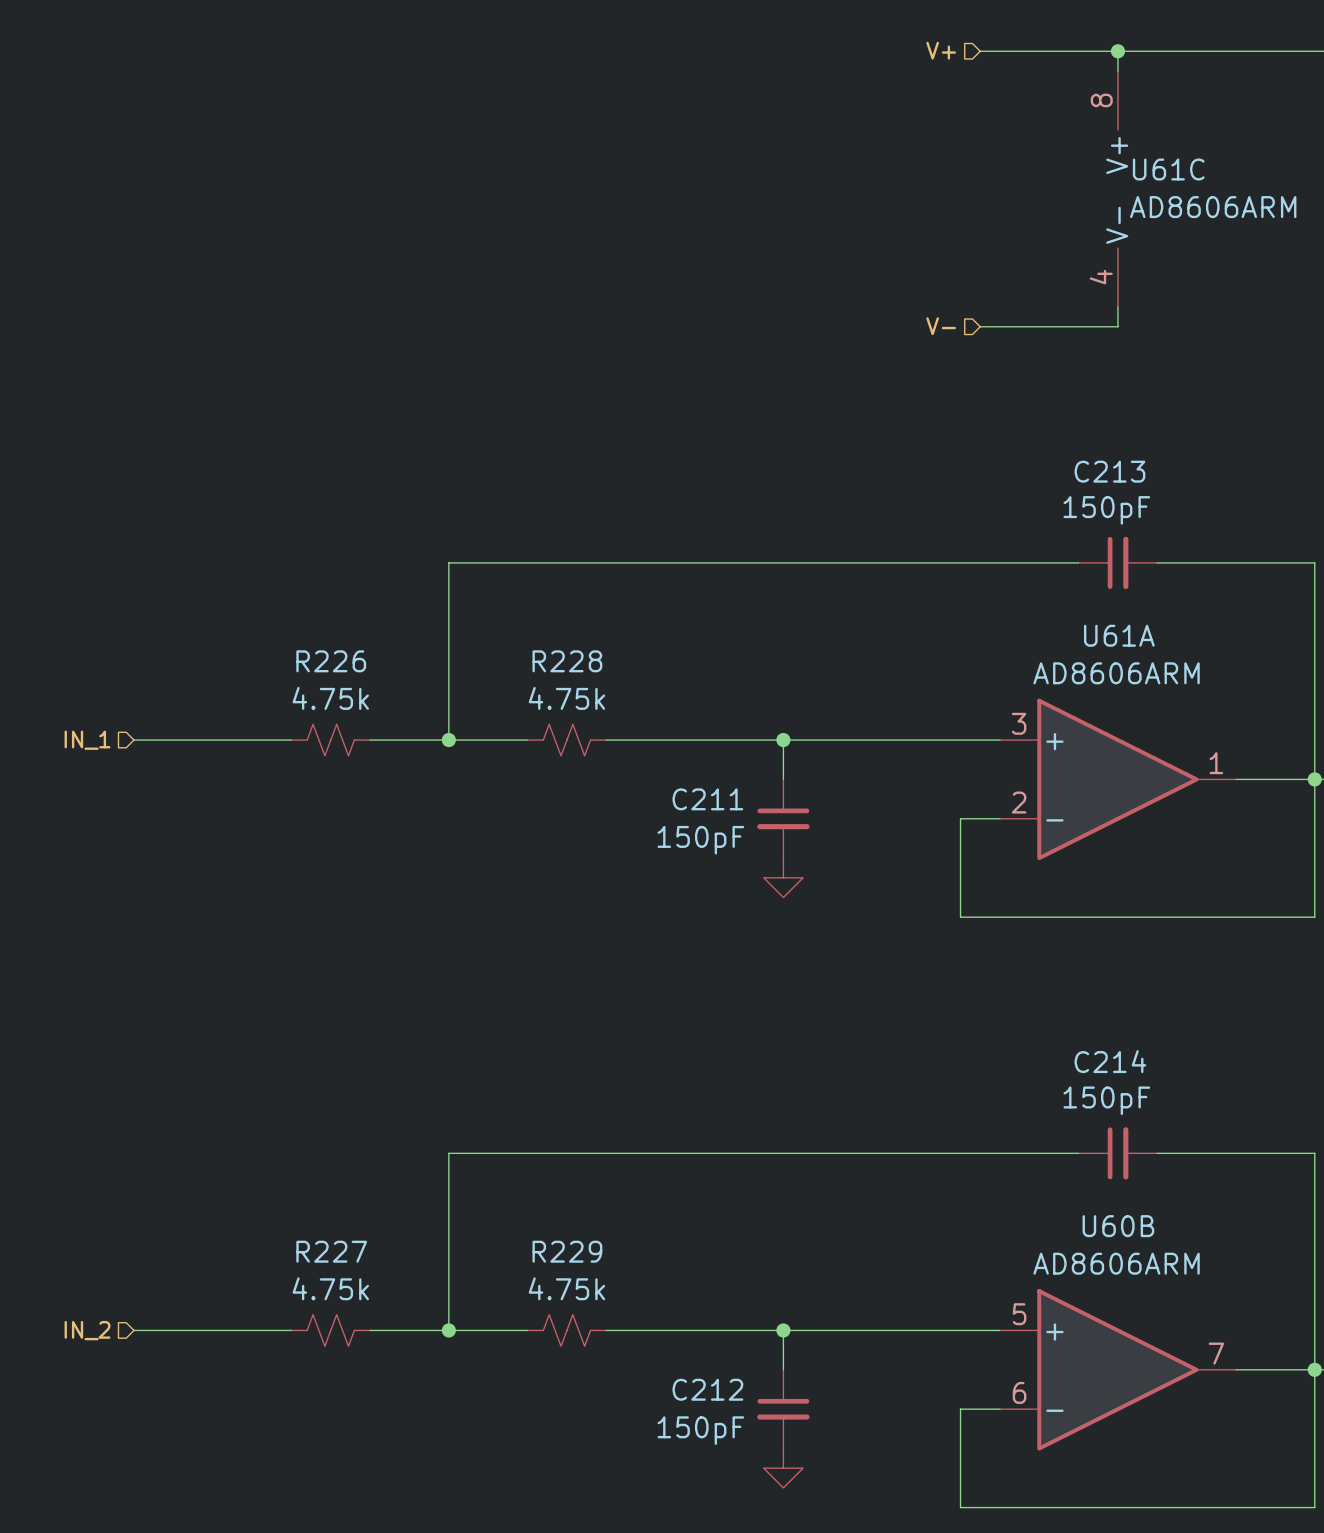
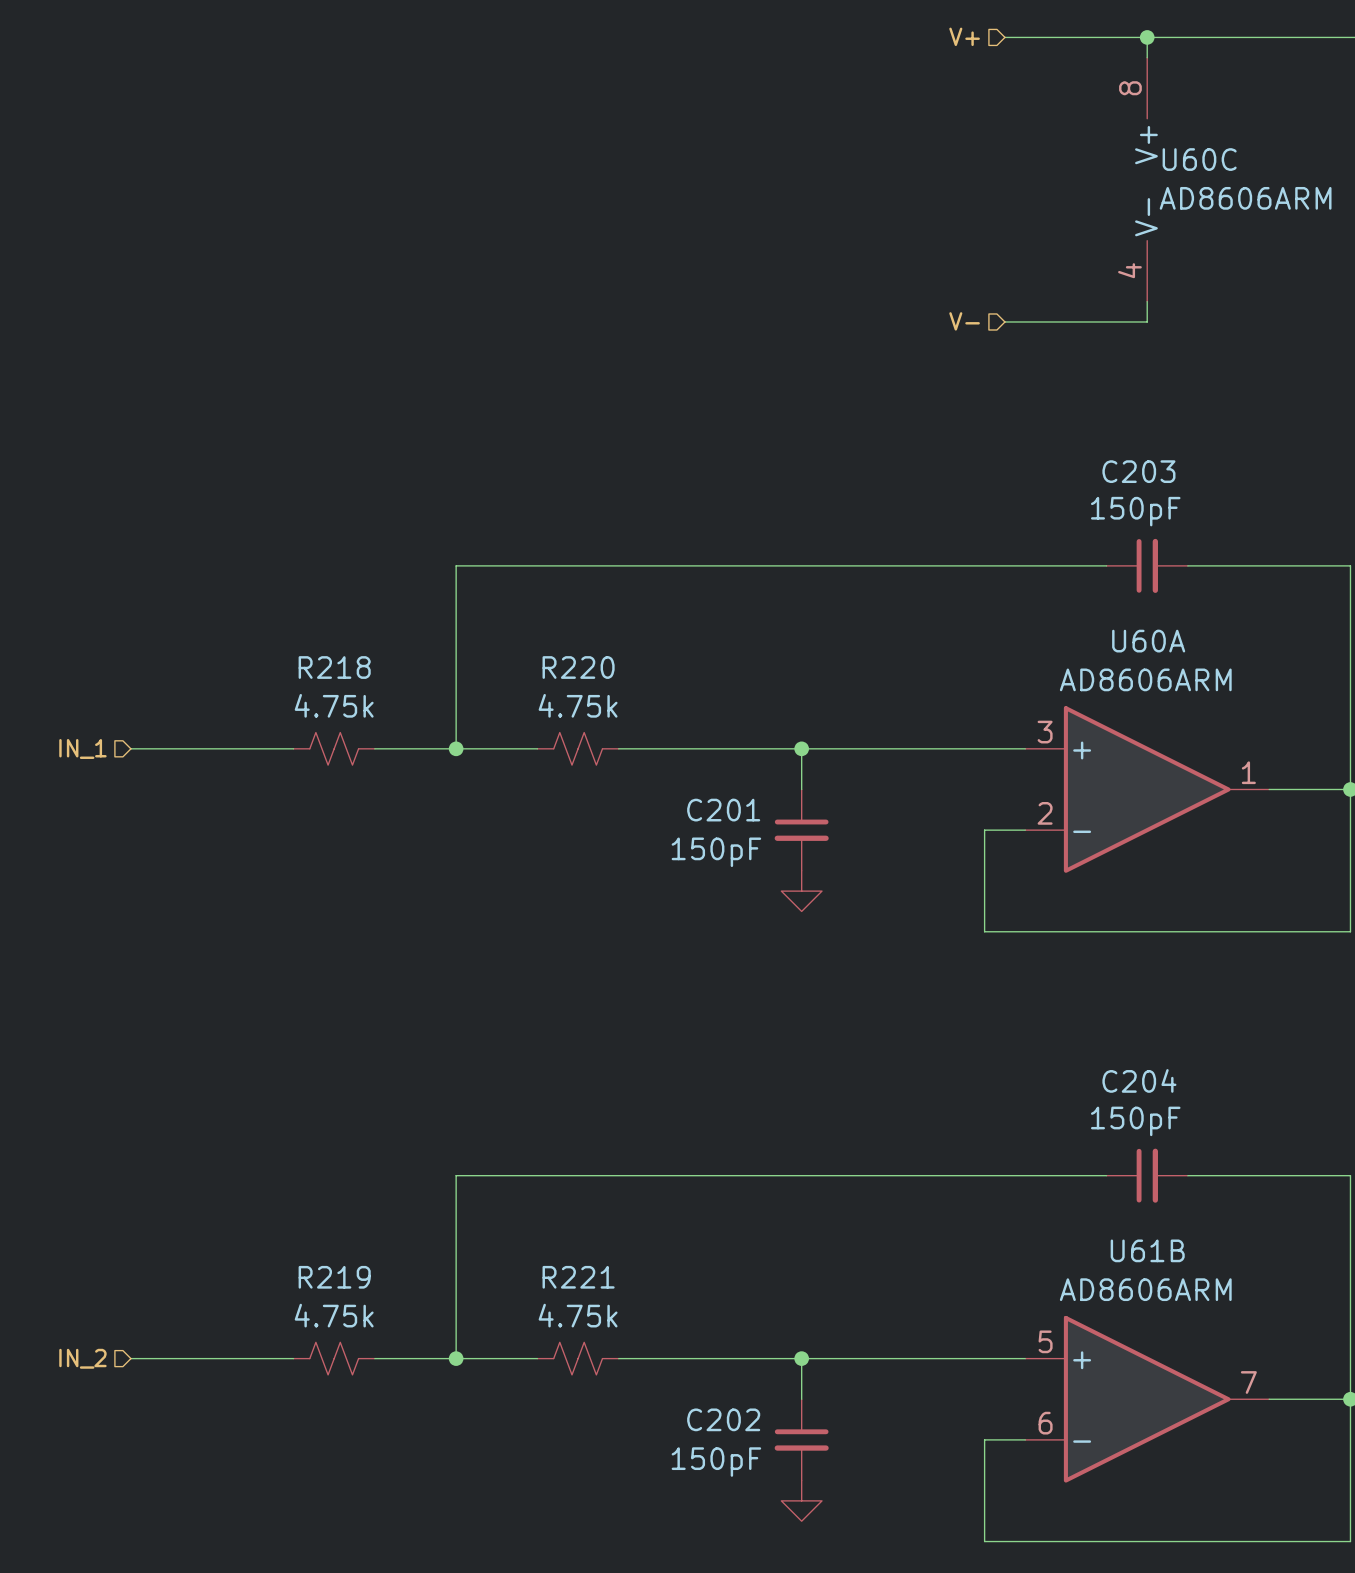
U61C name: U61C (1168, 169) -> U60C (1199, 159)
C213 name: C213 (1109, 471) -> C203 (1138, 471)
U61A name: U61A (1119, 635) -> U60A (1148, 641)
R226 name: R226 (331, 661) -> R218 (334, 667)
R228 name: R228 (567, 661) -> R220 (578, 667)
C211 name: C211 (707, 799) -> C201 (723, 810)
C214 name: C214 (1110, 1061) -> C204 (1139, 1080)
U60B name: U60B (1118, 1226) -> U61B (1147, 1250)
R227 name: R227 (331, 1251) -> R219 (334, 1277)
R229 name: R229 (567, 1251) -> R221 (578, 1277)
C212 name: C212 (707, 1389) -> C202 (723, 1419)

